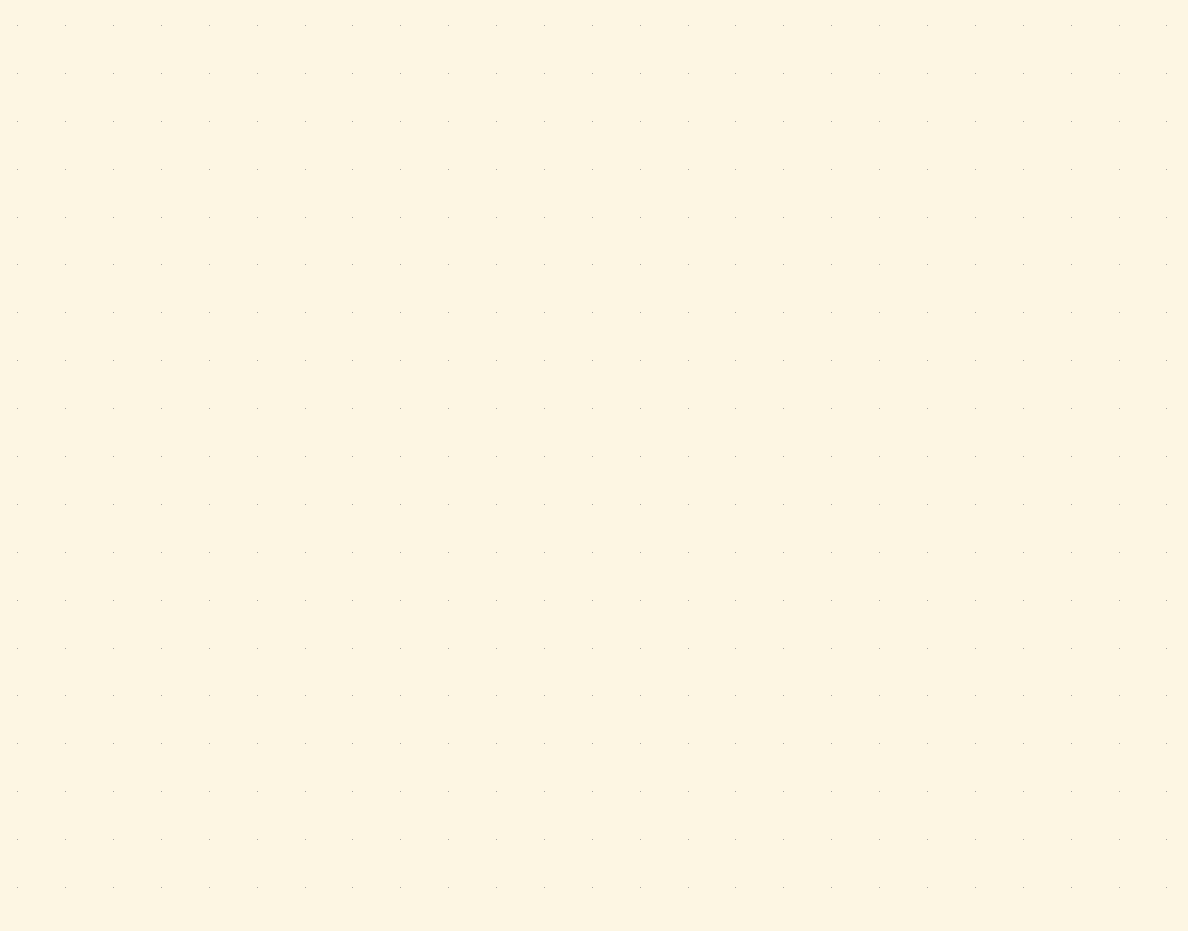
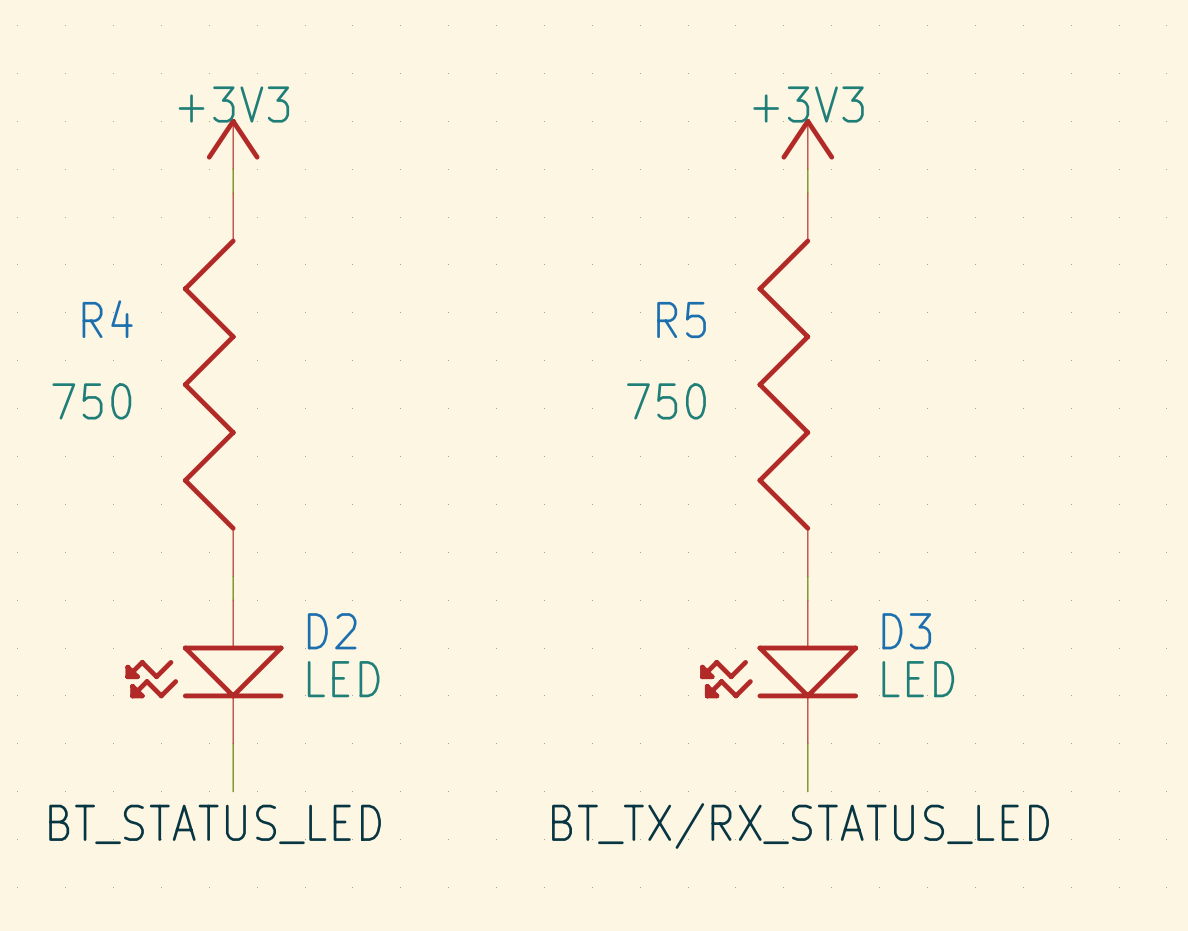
power symbol: none -> +3V3 (233, 144)
power symbol: none -> +3V3 (807, 144)
wire: none -> (233, 169) (233, 193)
wire: none -> (807, 169) (807, 193)
R4: none -> 750 (209, 384)
R5: none -> 750 (783, 384)
wire: none -> (233, 576) (233, 600)
wire: none -> (807, 576) (807, 600)
D2: none -> LED (204, 671)
D3: none -> LED (779, 671)
wire: none -> (233, 743) (233, 791)
wire: none -> (807, 743) (807, 791)
label: none -> BT_STATUS_LED (215, 824)
label: none -> BT_TX/RX_STATUS_LED (800, 826)

